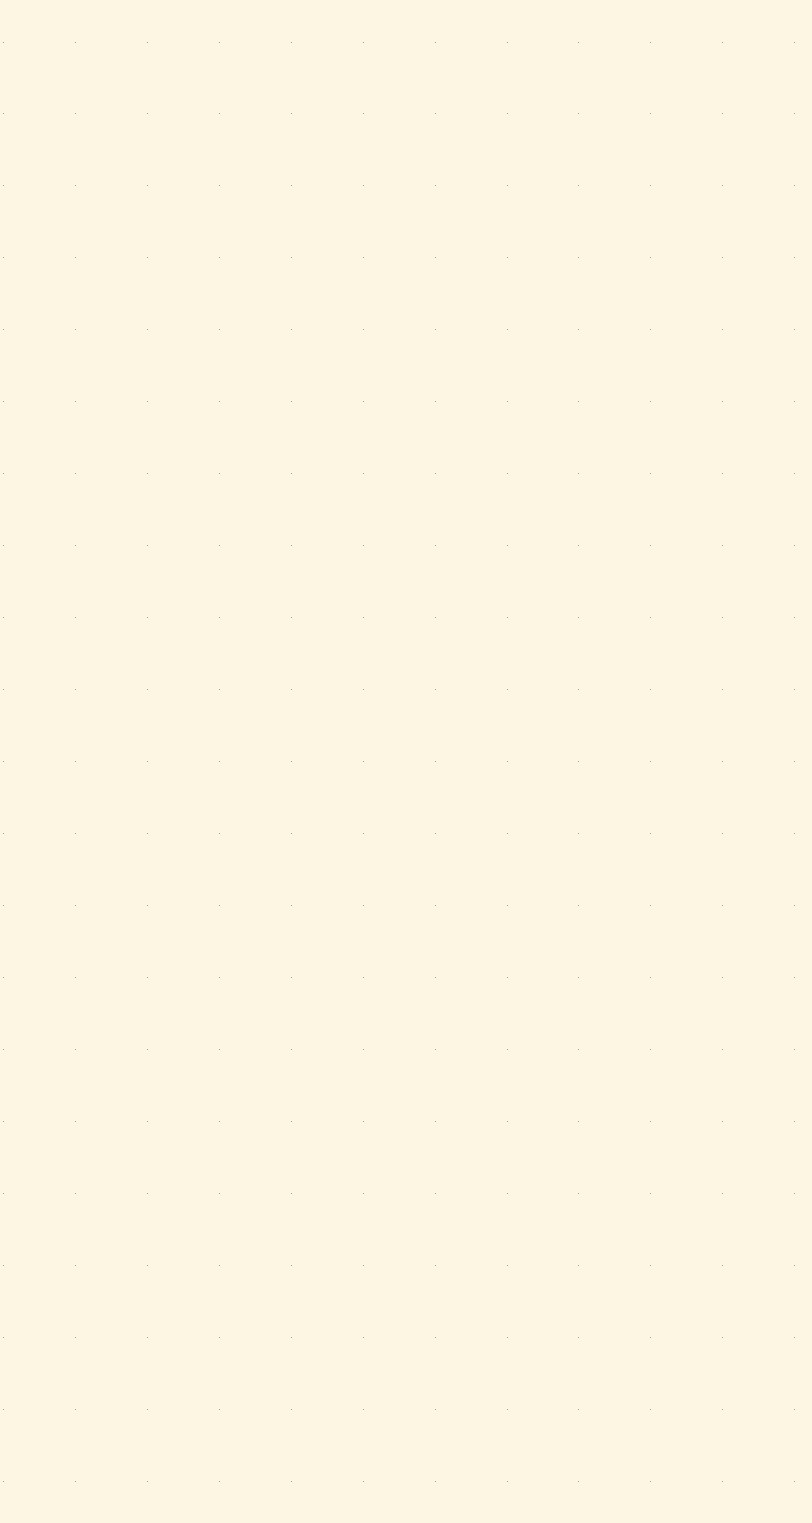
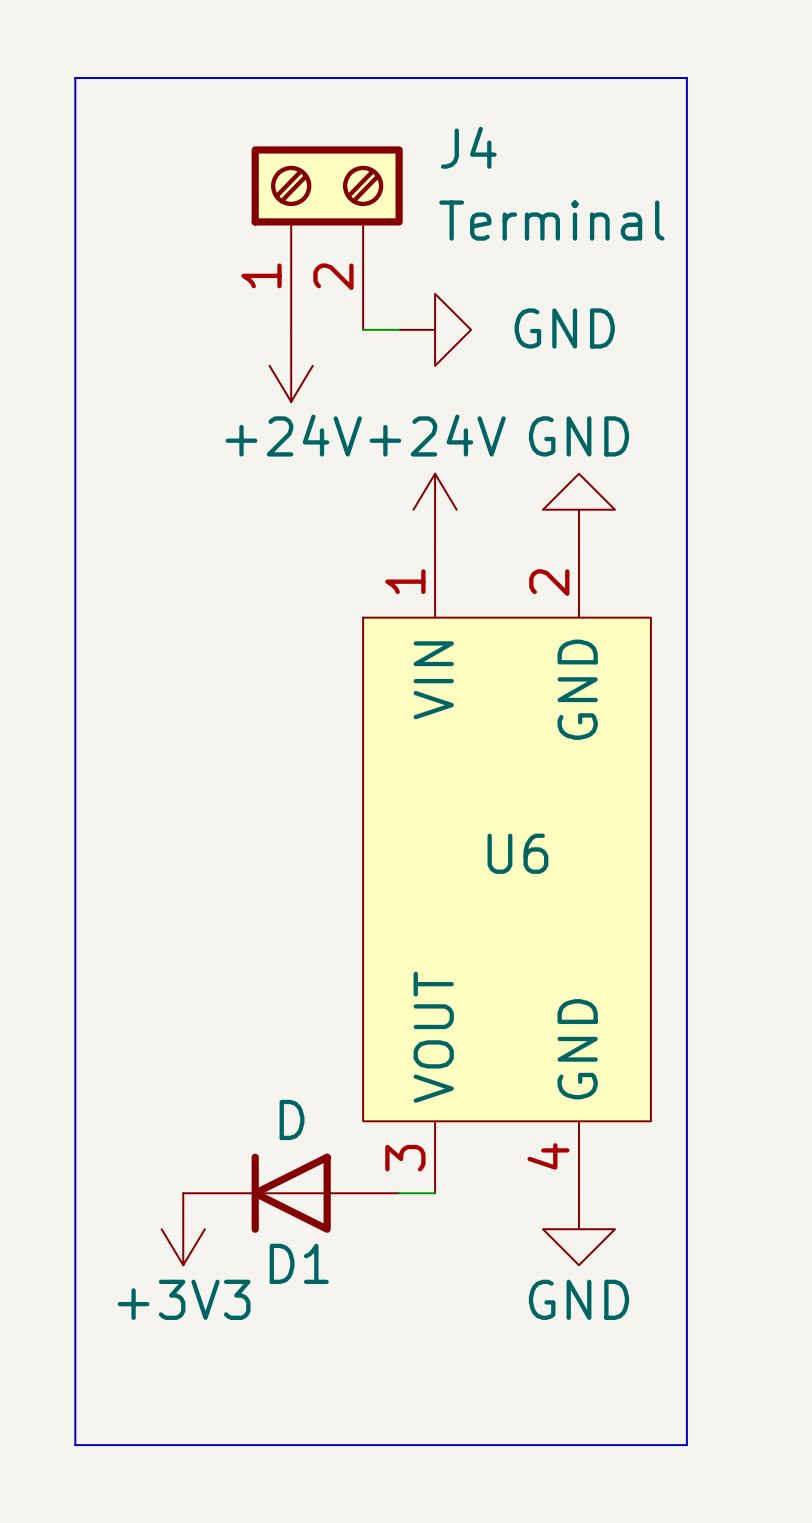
line: none -> (75, 78) (686, 78) (686, 1445) (75, 1445) (75, 78)
J4: none -> Terminal (327, 238)
wire: none -> (363, 329) (399, 329)
power symbol: none -> GND (435, 329)
power symbol: none -> +24V (291, 365)
power symbol: none -> +24V (435, 509)
power symbol: none -> GND (578, 509)
U6: none -> (507, 869)
D1: none -> D (291, 1193)
wire: none -> (399, 1193) (435, 1193)
power symbol: none -> +3V3 (183, 1229)
power symbol: none -> GND (578, 1229)

